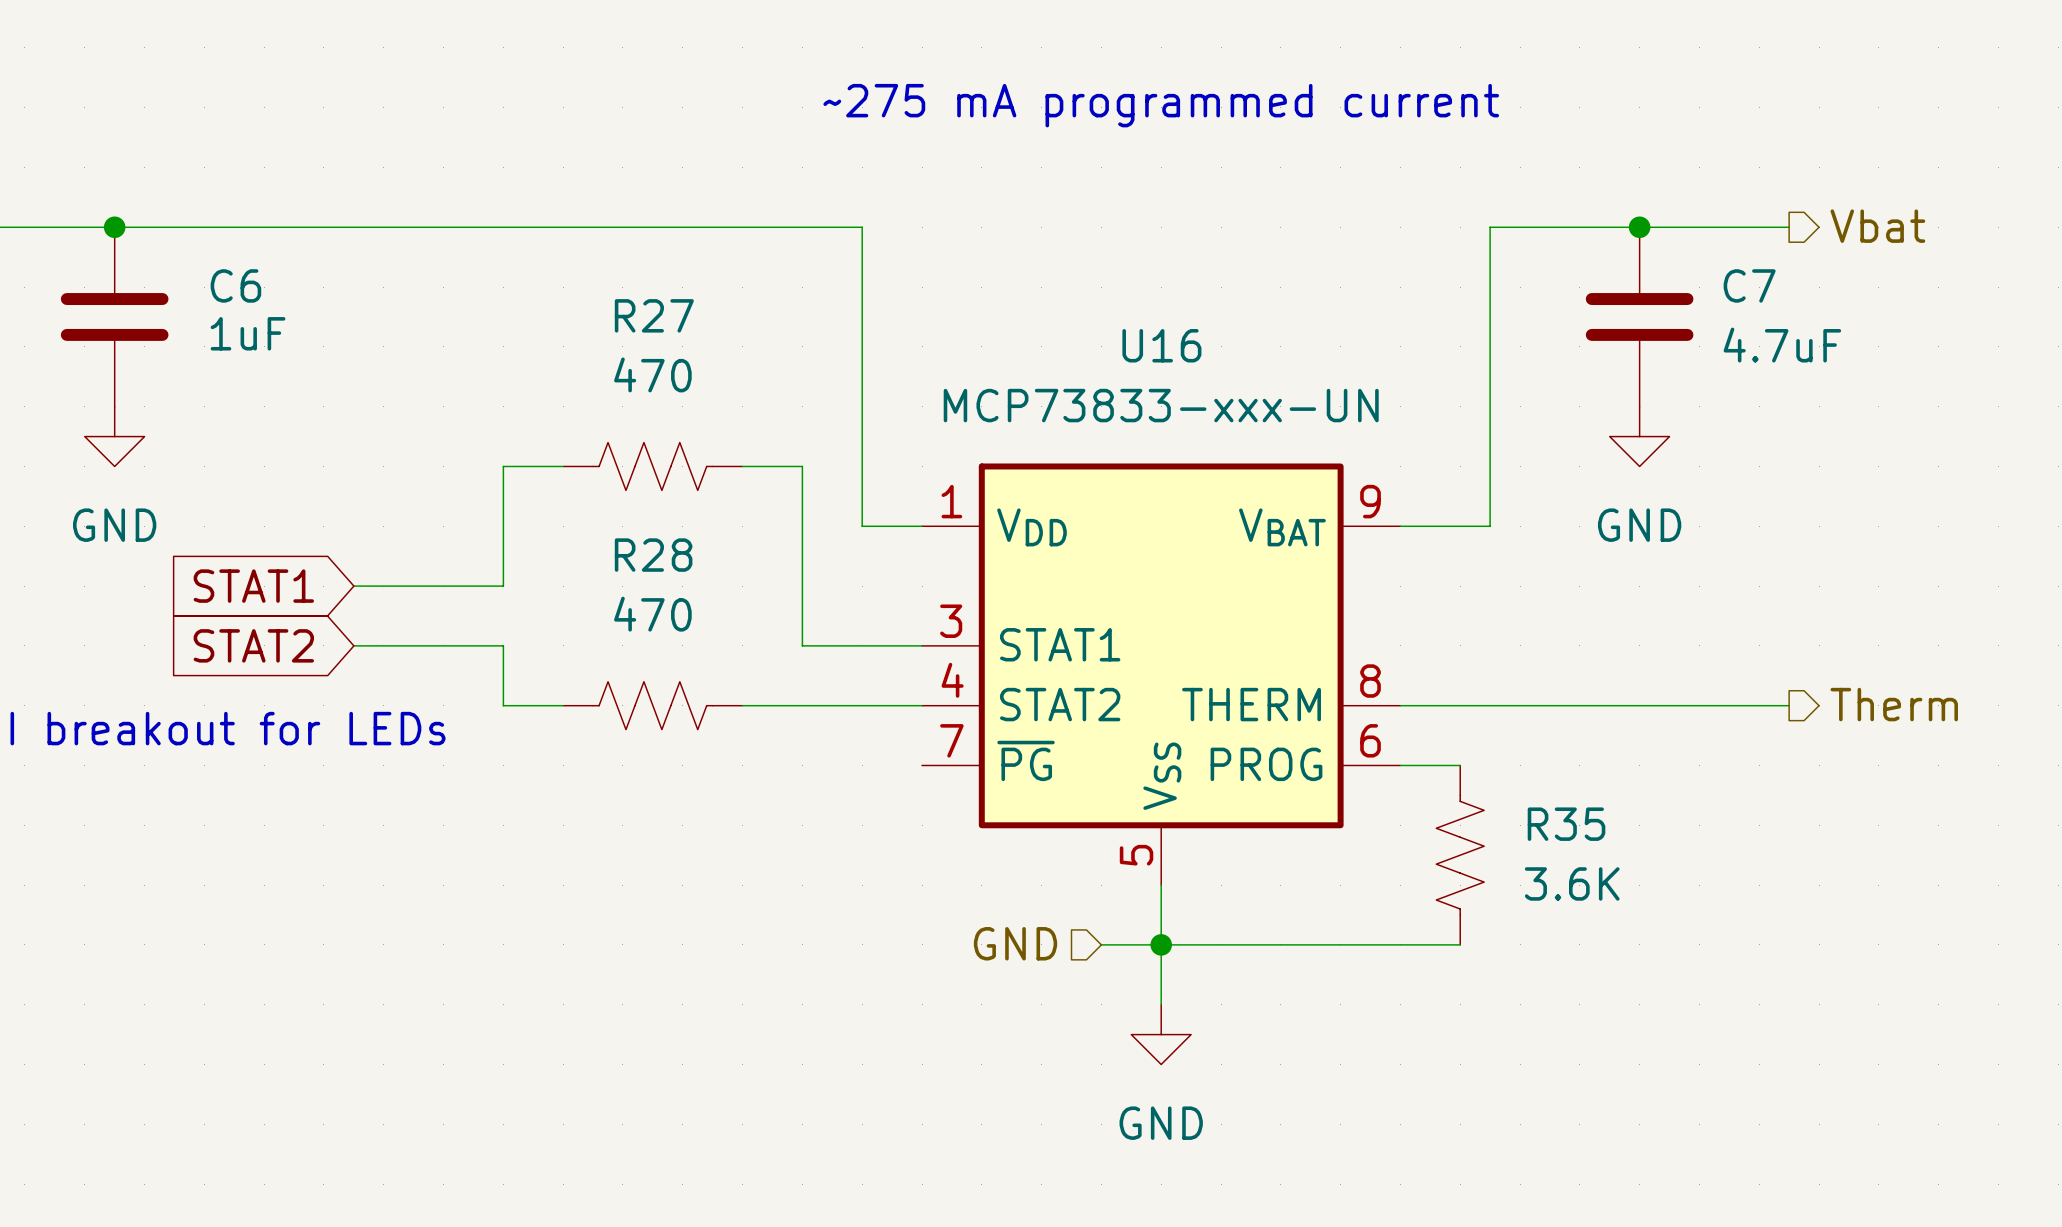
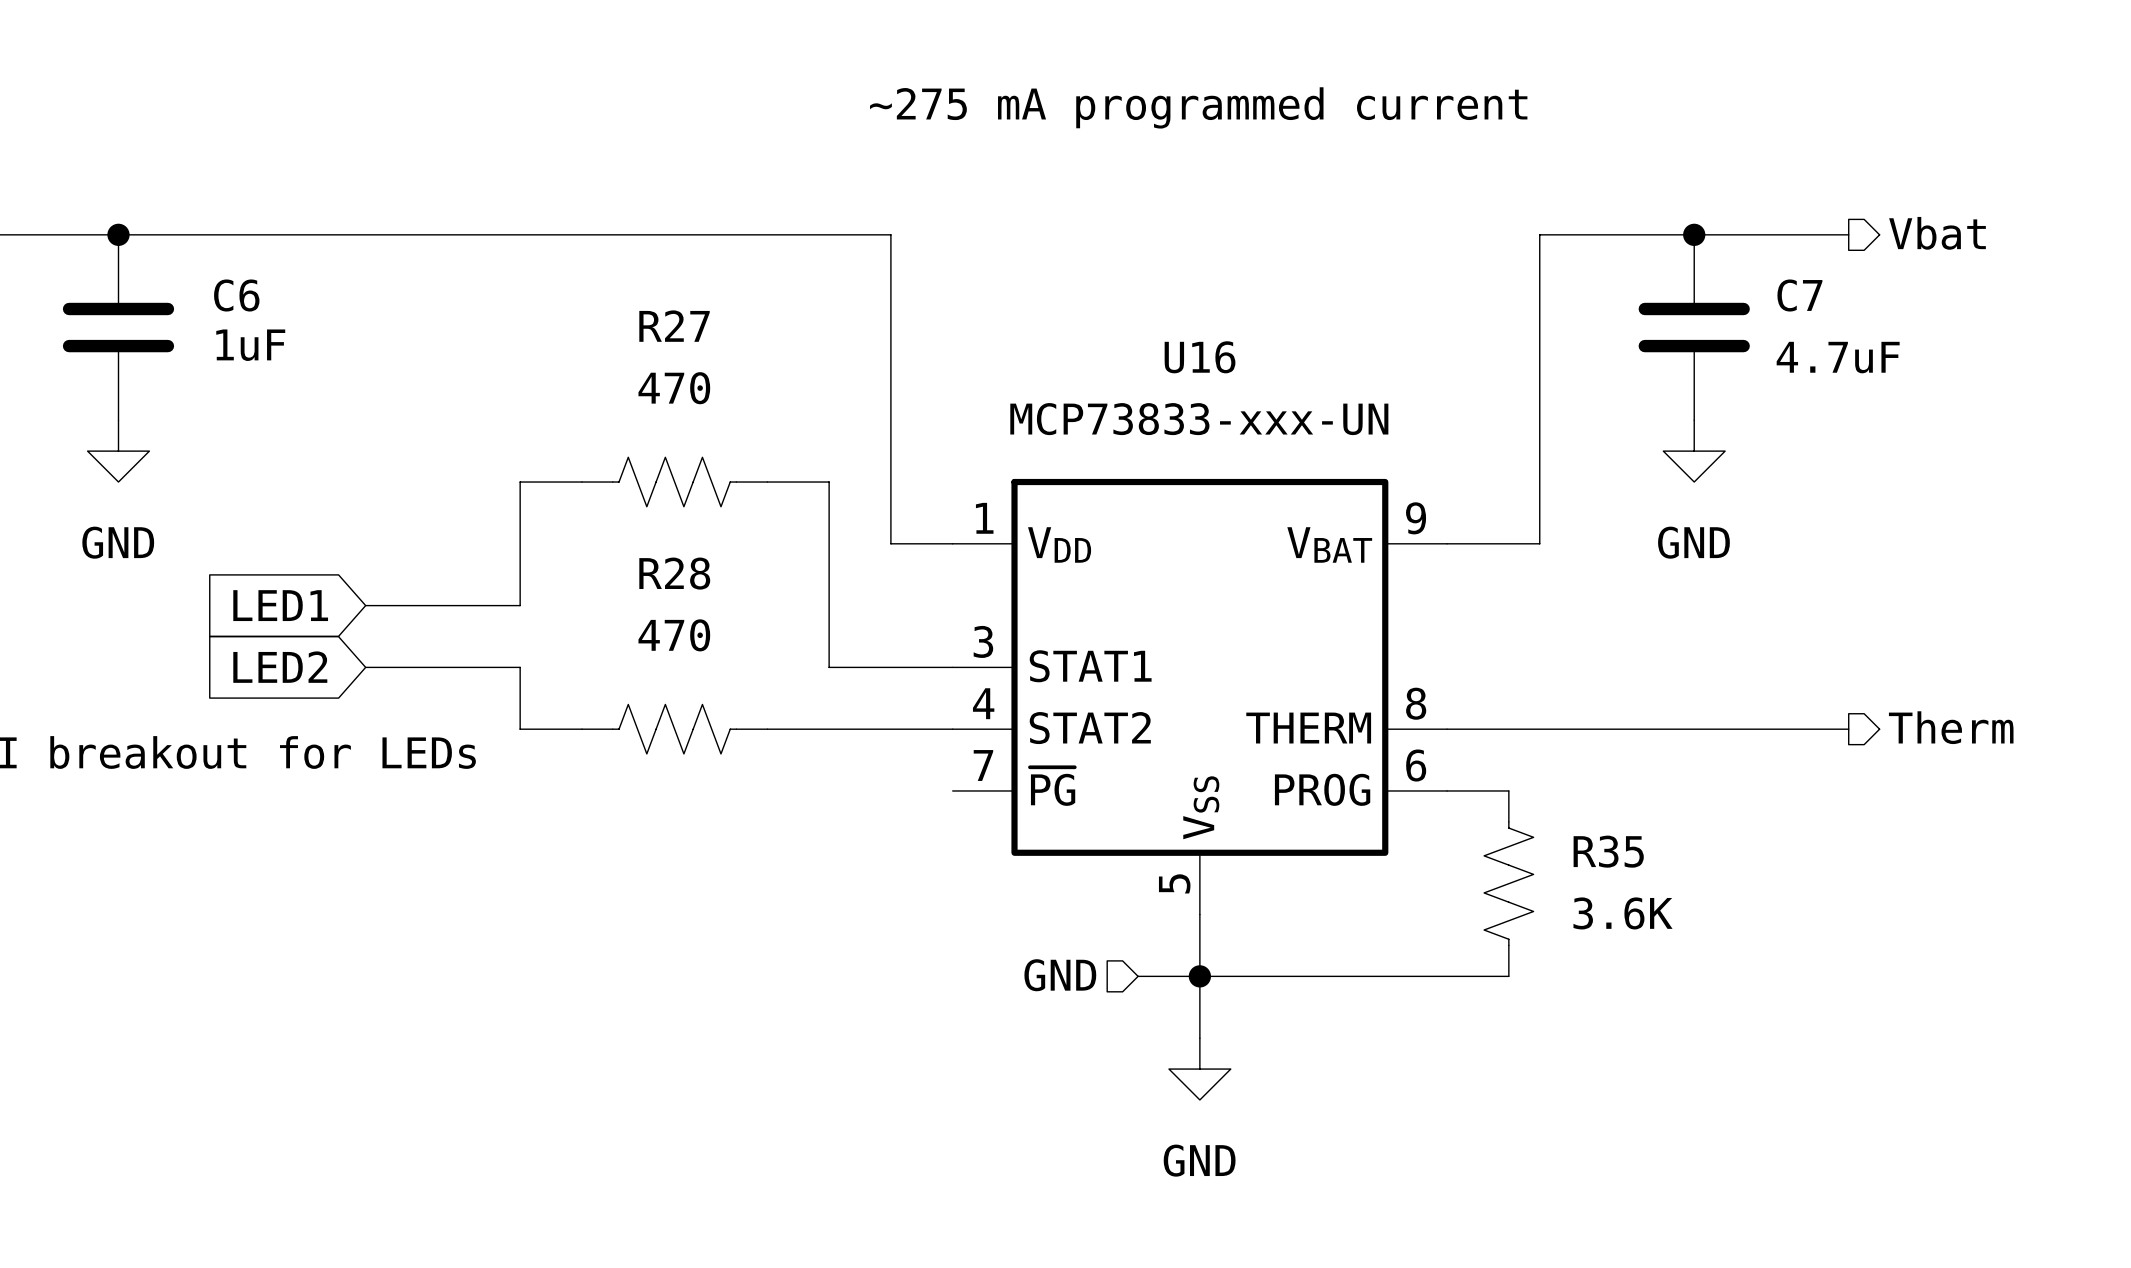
global label: STAT1 (253, 586) -> LED1 (280, 605)
global label: STAT2 (253, 645) -> LED2 (280, 667)

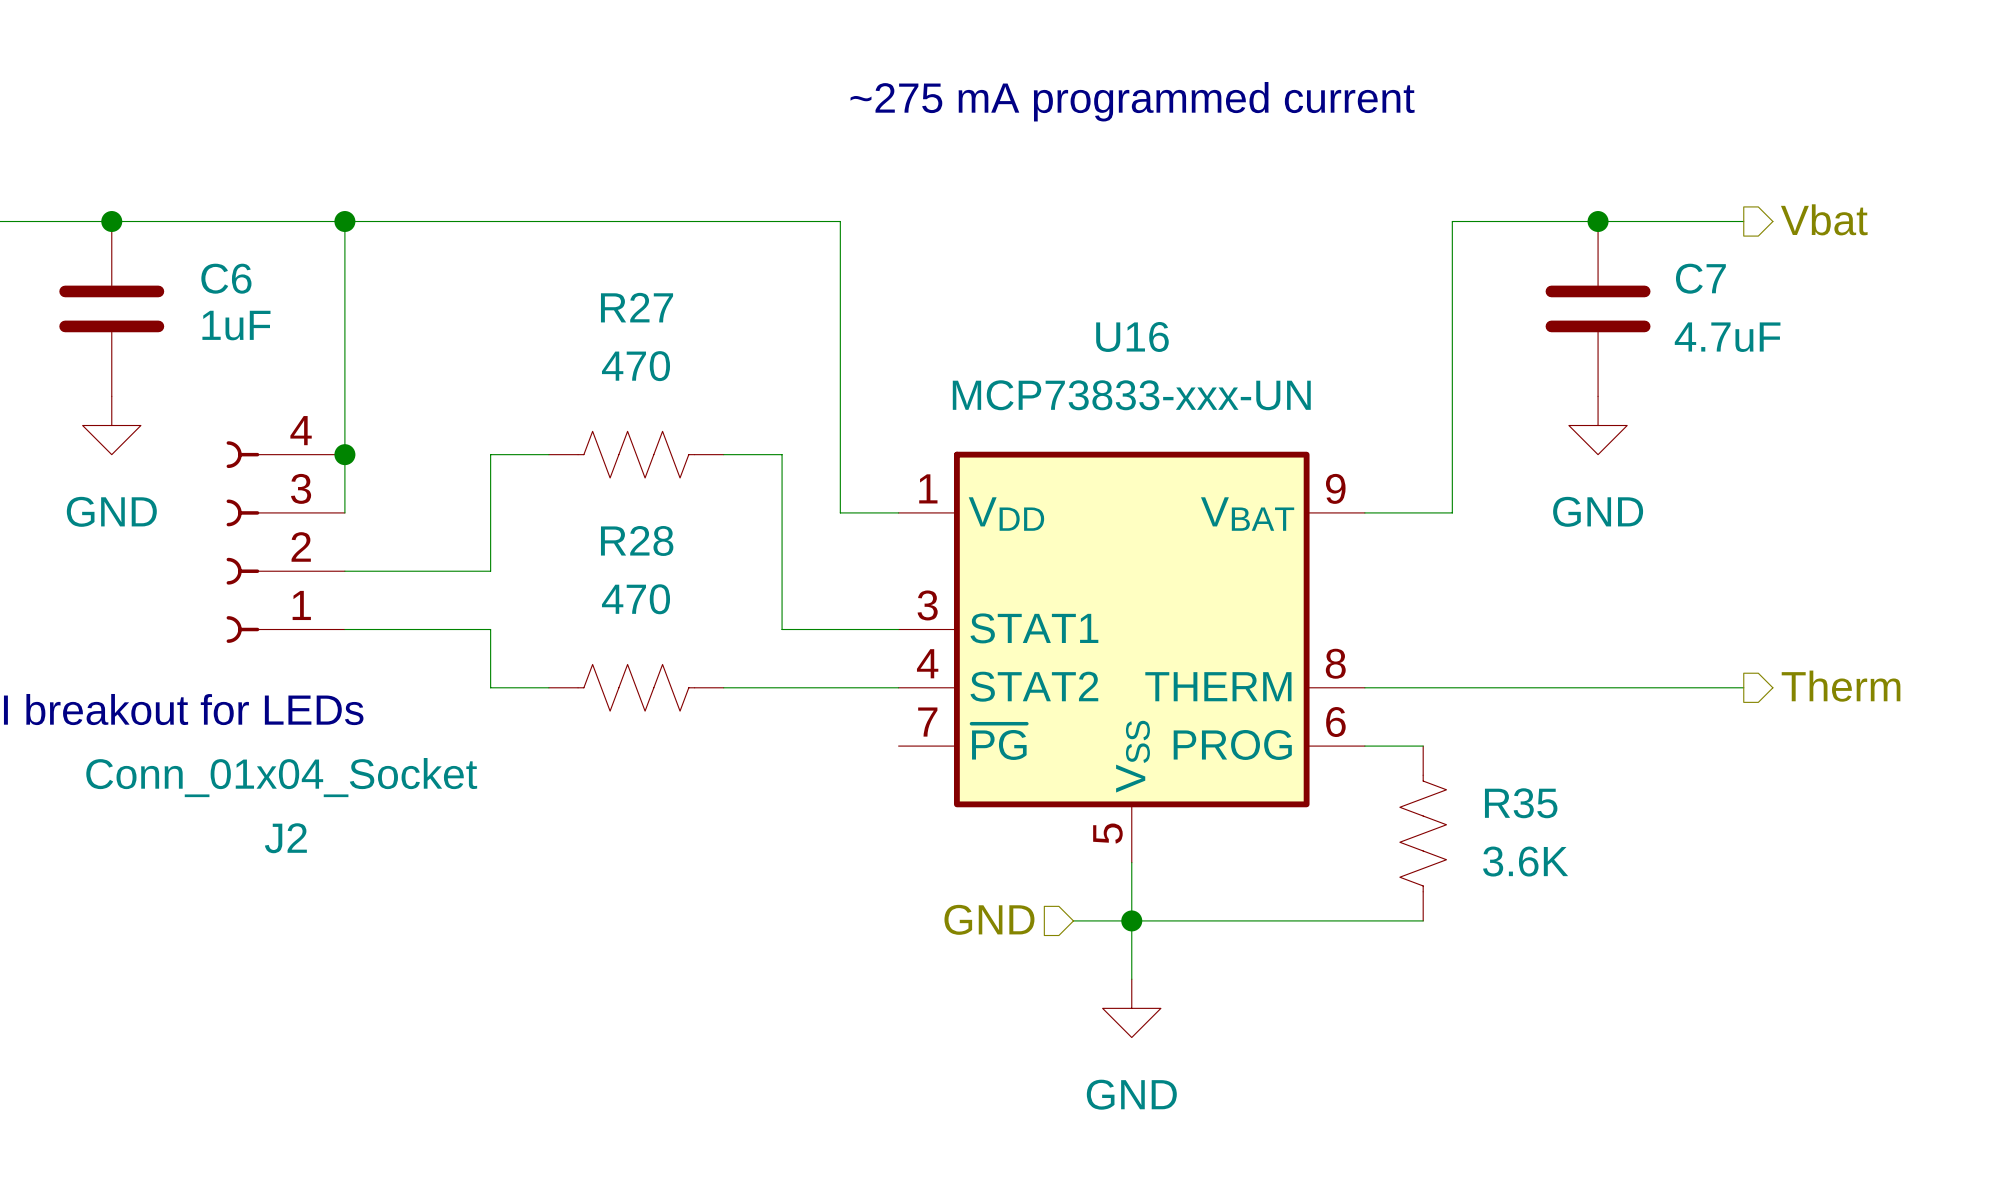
wire: none -> (344, 221) (344, 512)
junction: none -> (344, 221)
junction: none -> (344, 454)
J2: none -> Conn_01x04_Socket (285, 542)
global label: LED1 (280, 605) -> none
global label: LED2 (280, 667) -> none

